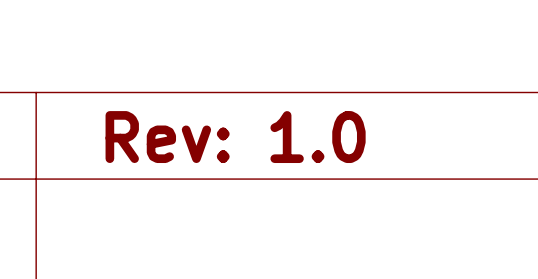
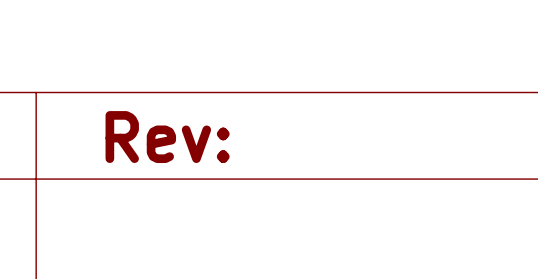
title block: Rev: 1.0 (235, 137) -> Rev: (167, 137)

